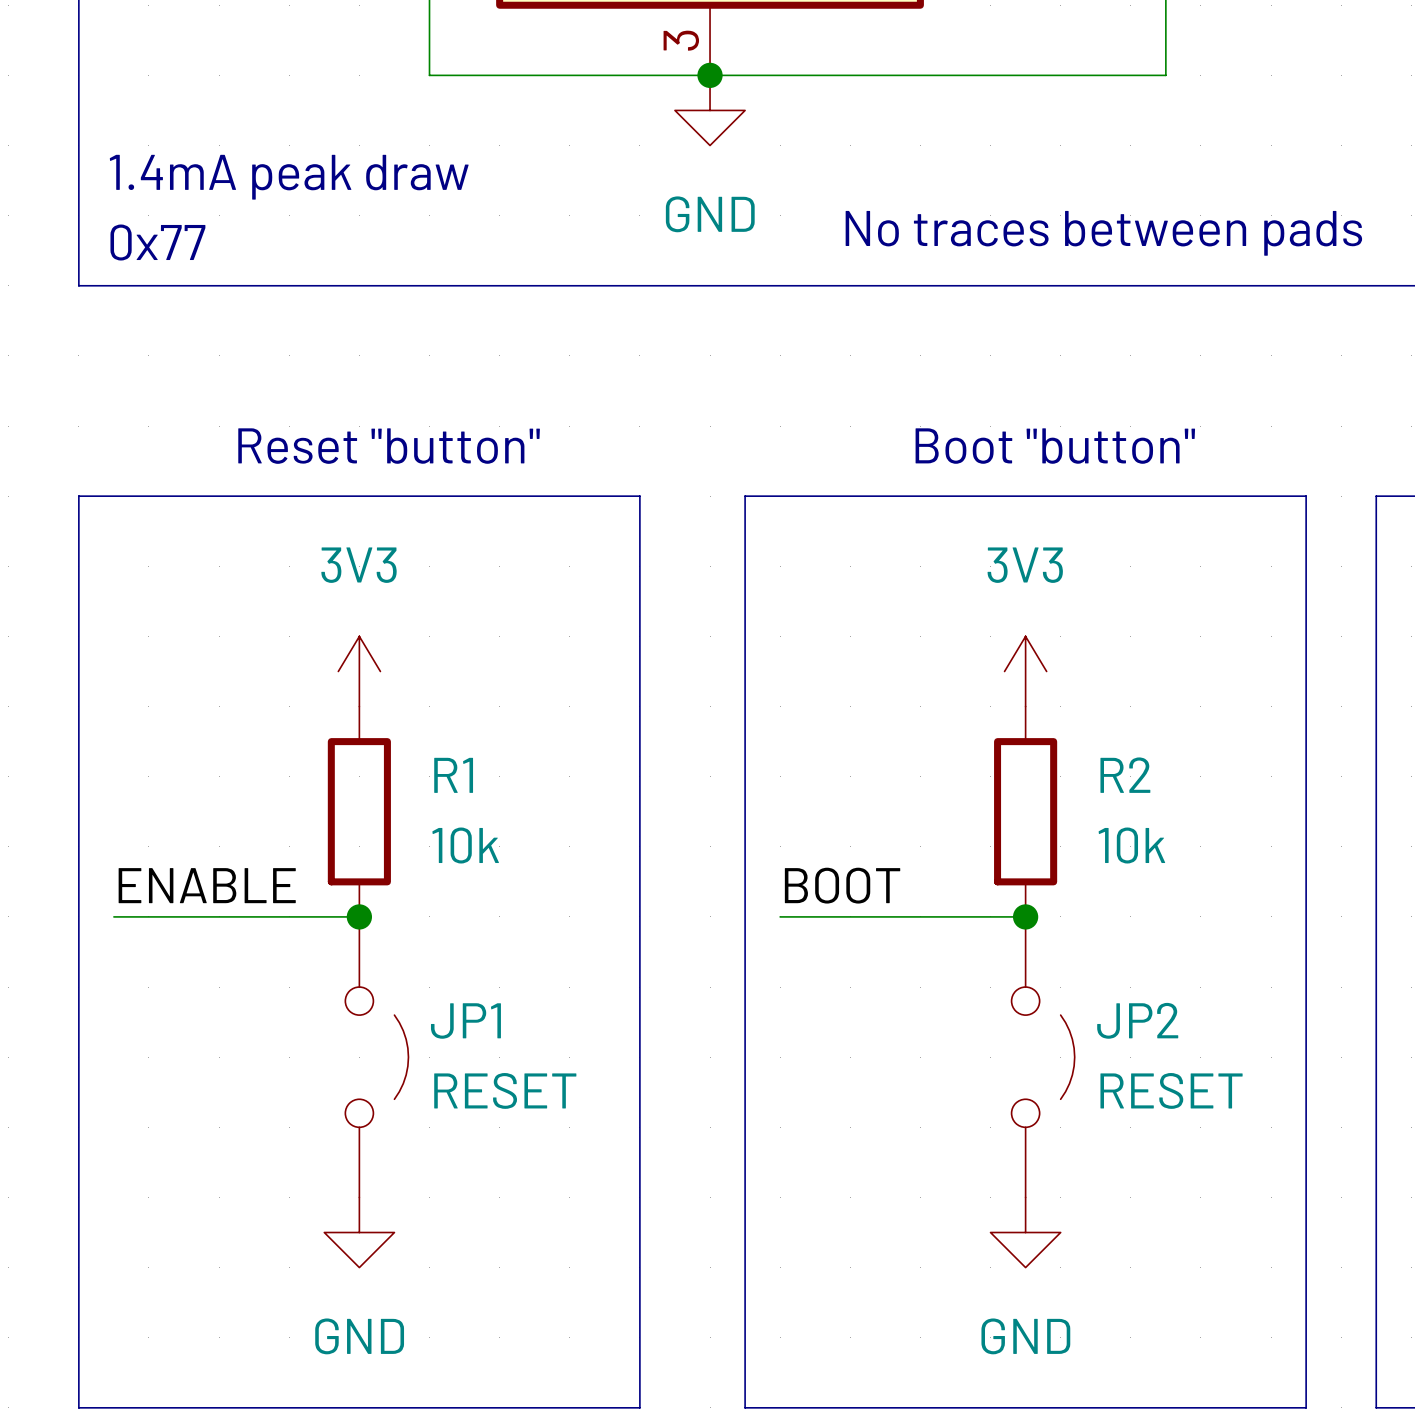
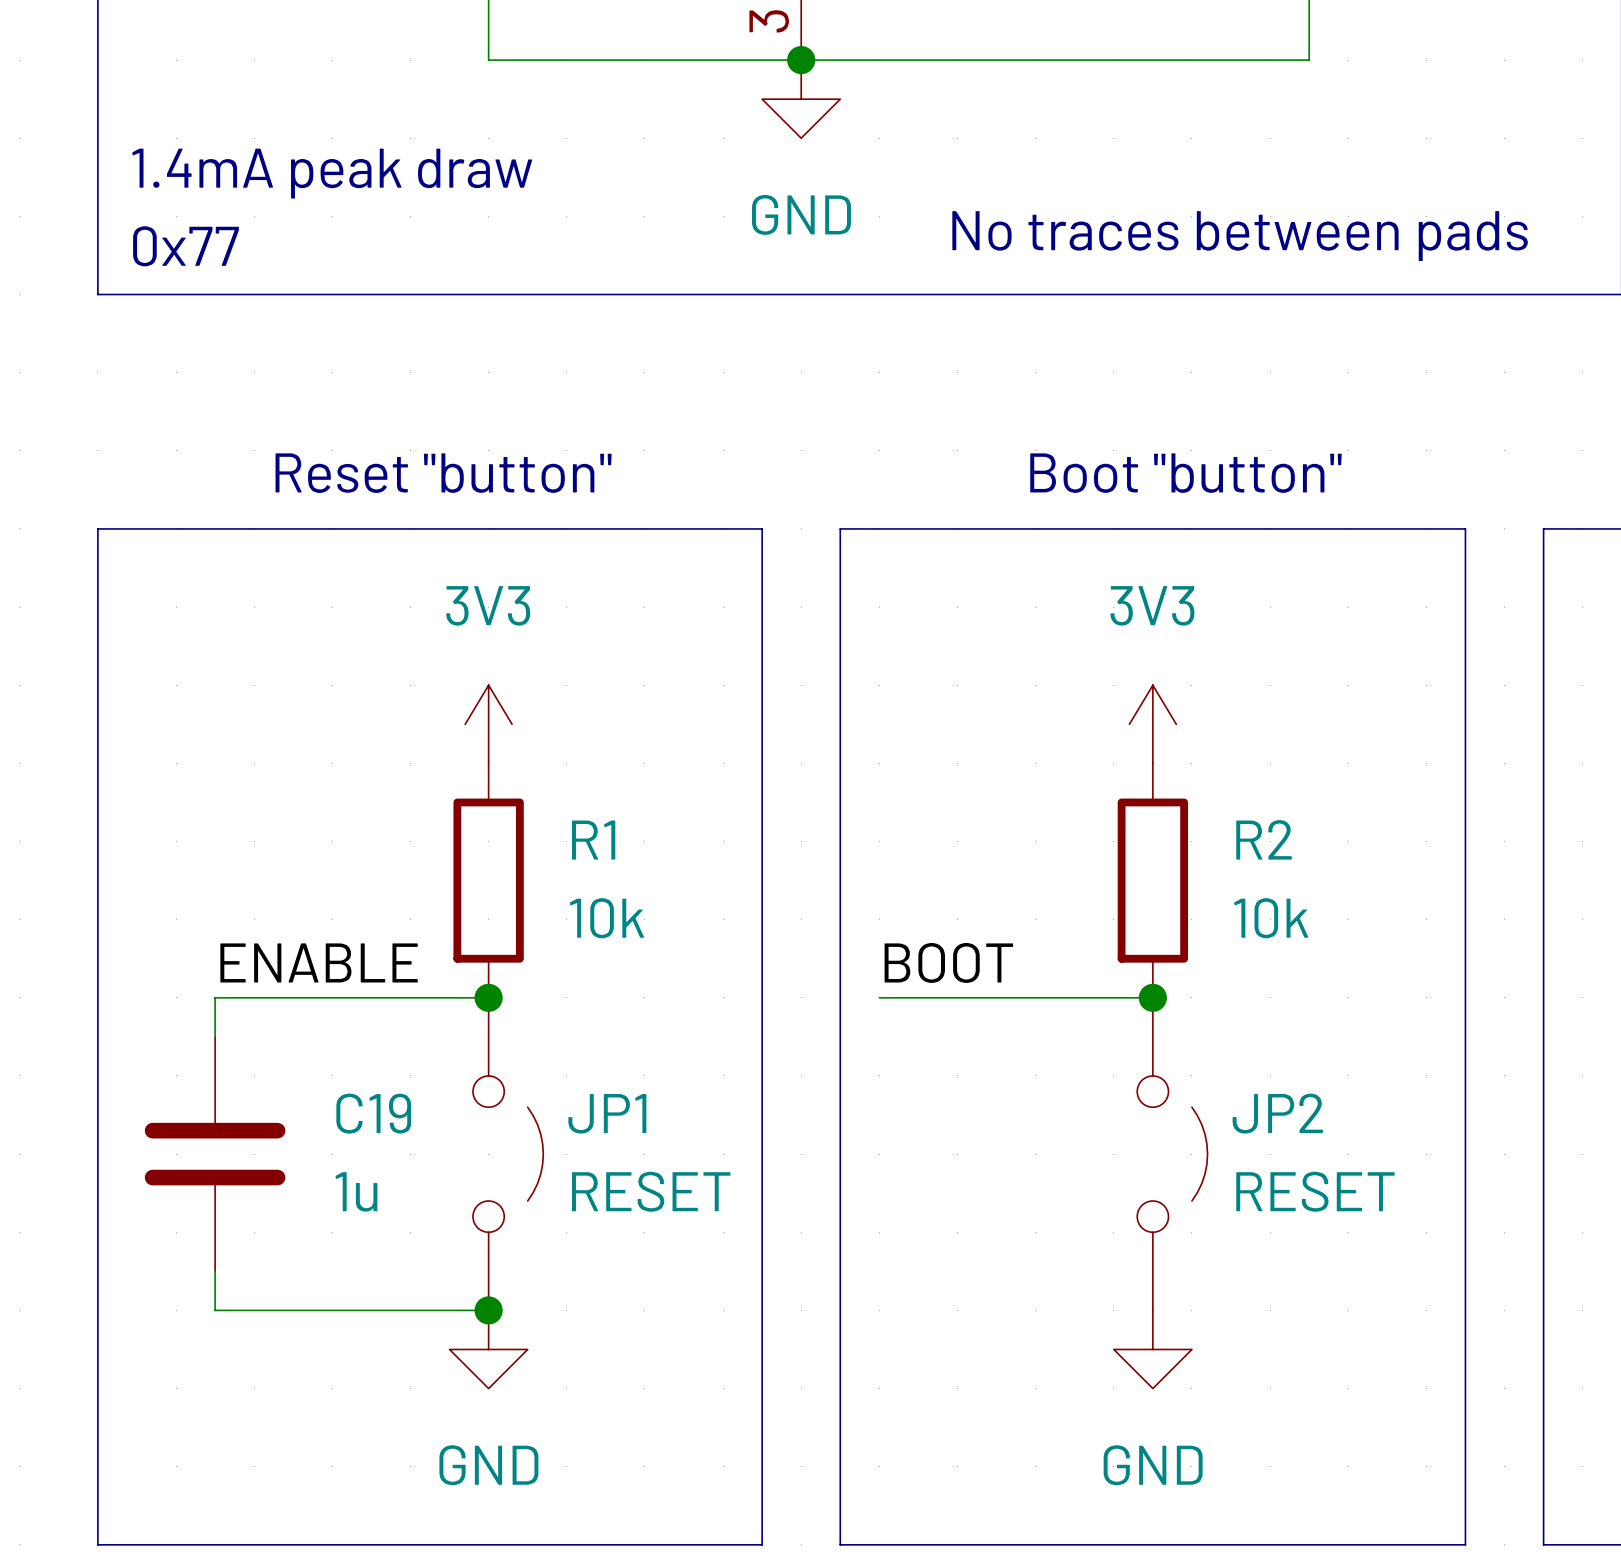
line: (639, 496) (639, 1407) -> (723, 528) (762, 528) (762, 1544) (723, 1544)
power symbol position: 3V3 (359, 671) -> 3V3 (488, 724)
R1 position: (359, 811) -> (488, 880)
label position: ENABLE (207, 885) -> ENABLE (319, 962)
wire: (113, 916) (184, 916) -> (215, 1036) (215, 997)
wire: none -> (410, 997) (488, 997)
junction position: (359, 916) -> (488, 997)
C19: none -> 1u (215, 1154)
JP1 position: (376, 1057) -> (508, 1154)
wire: none -> (215, 1271) (215, 1310) (488, 1310)
junction: none -> (488, 1310)
power symbol position: GND (359, 1232) -> GND (488, 1349)

